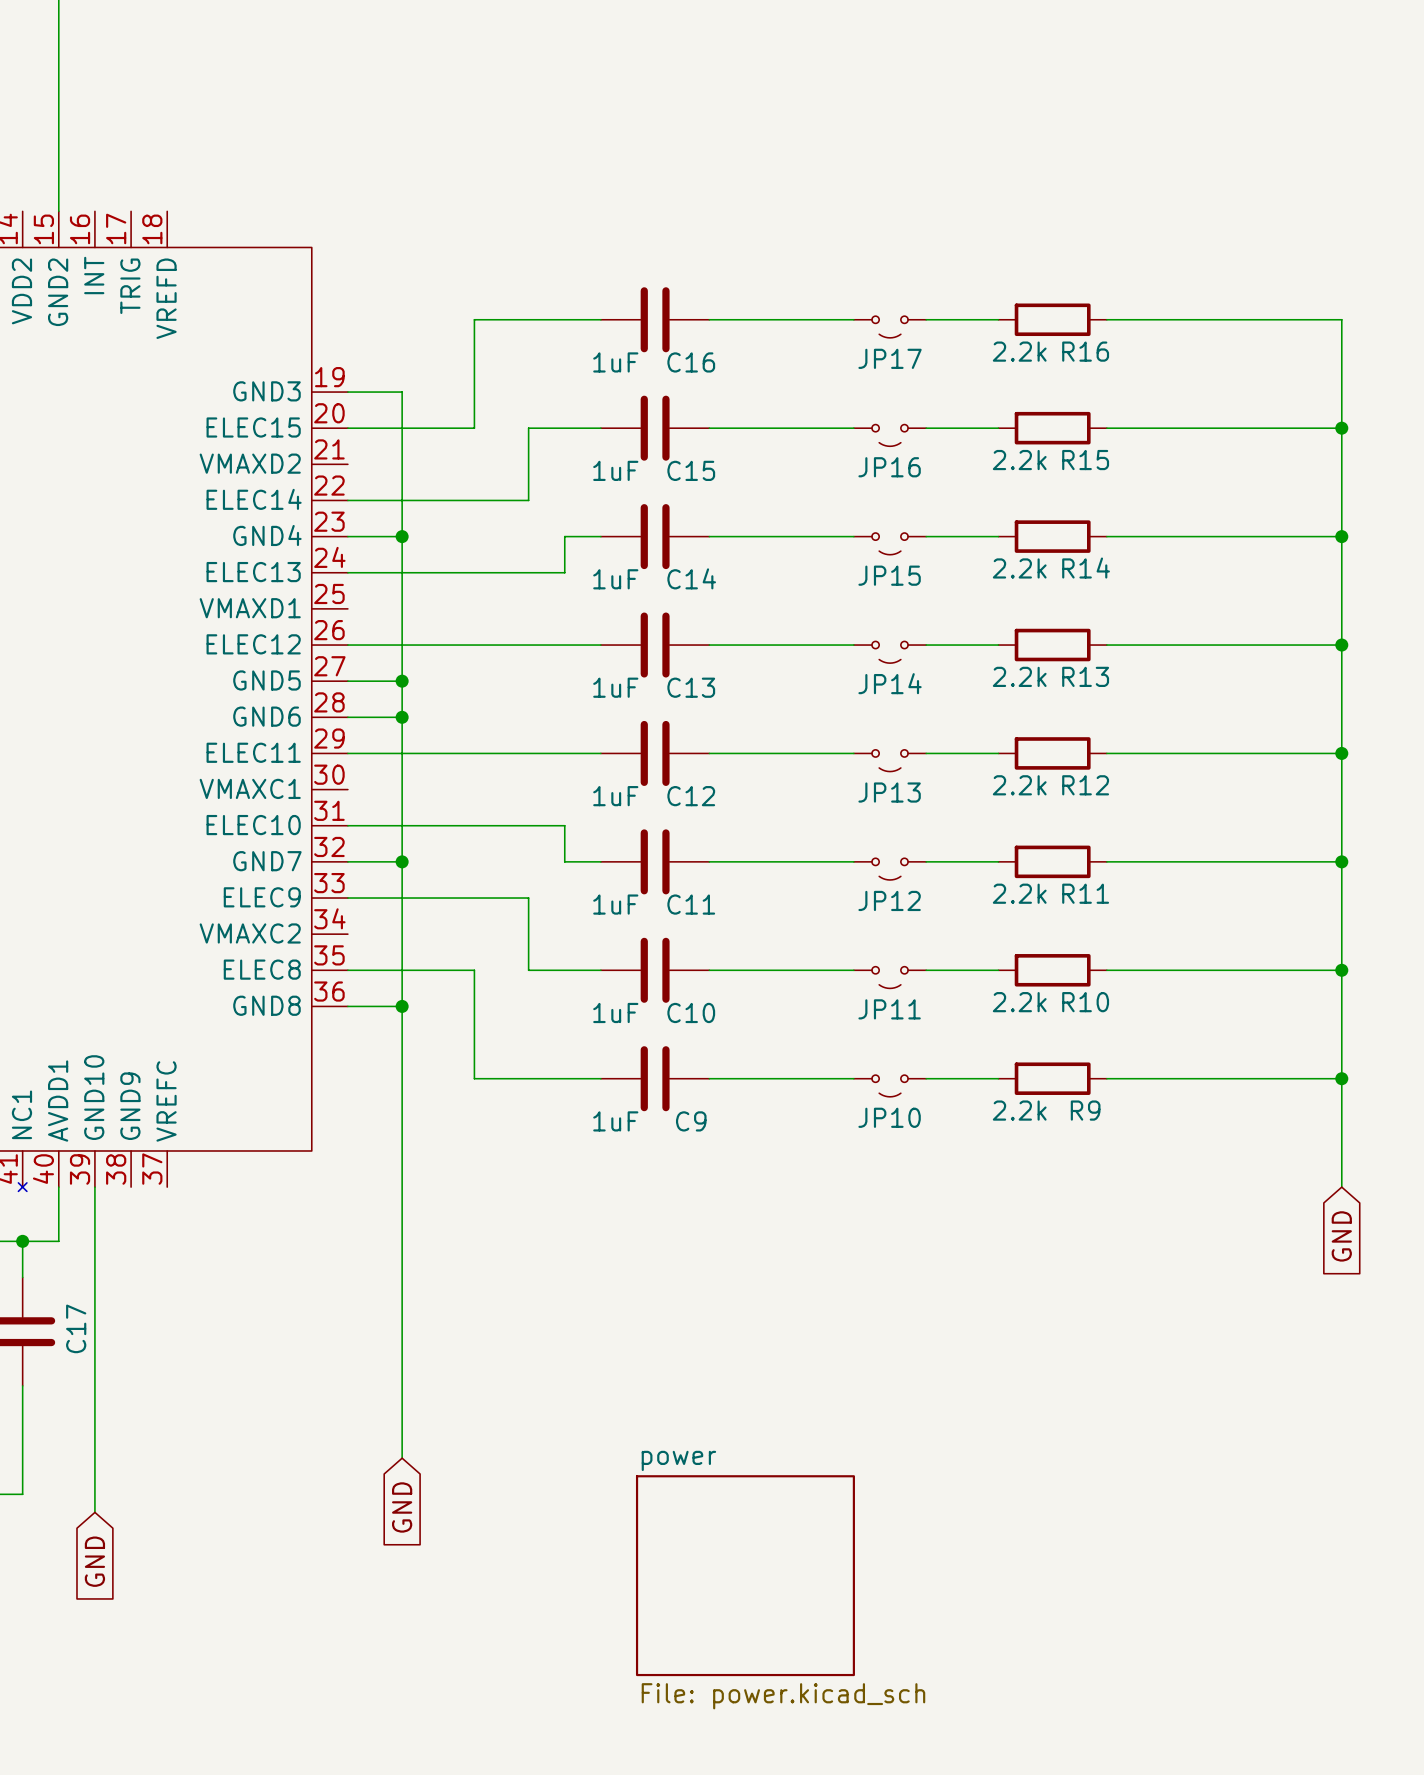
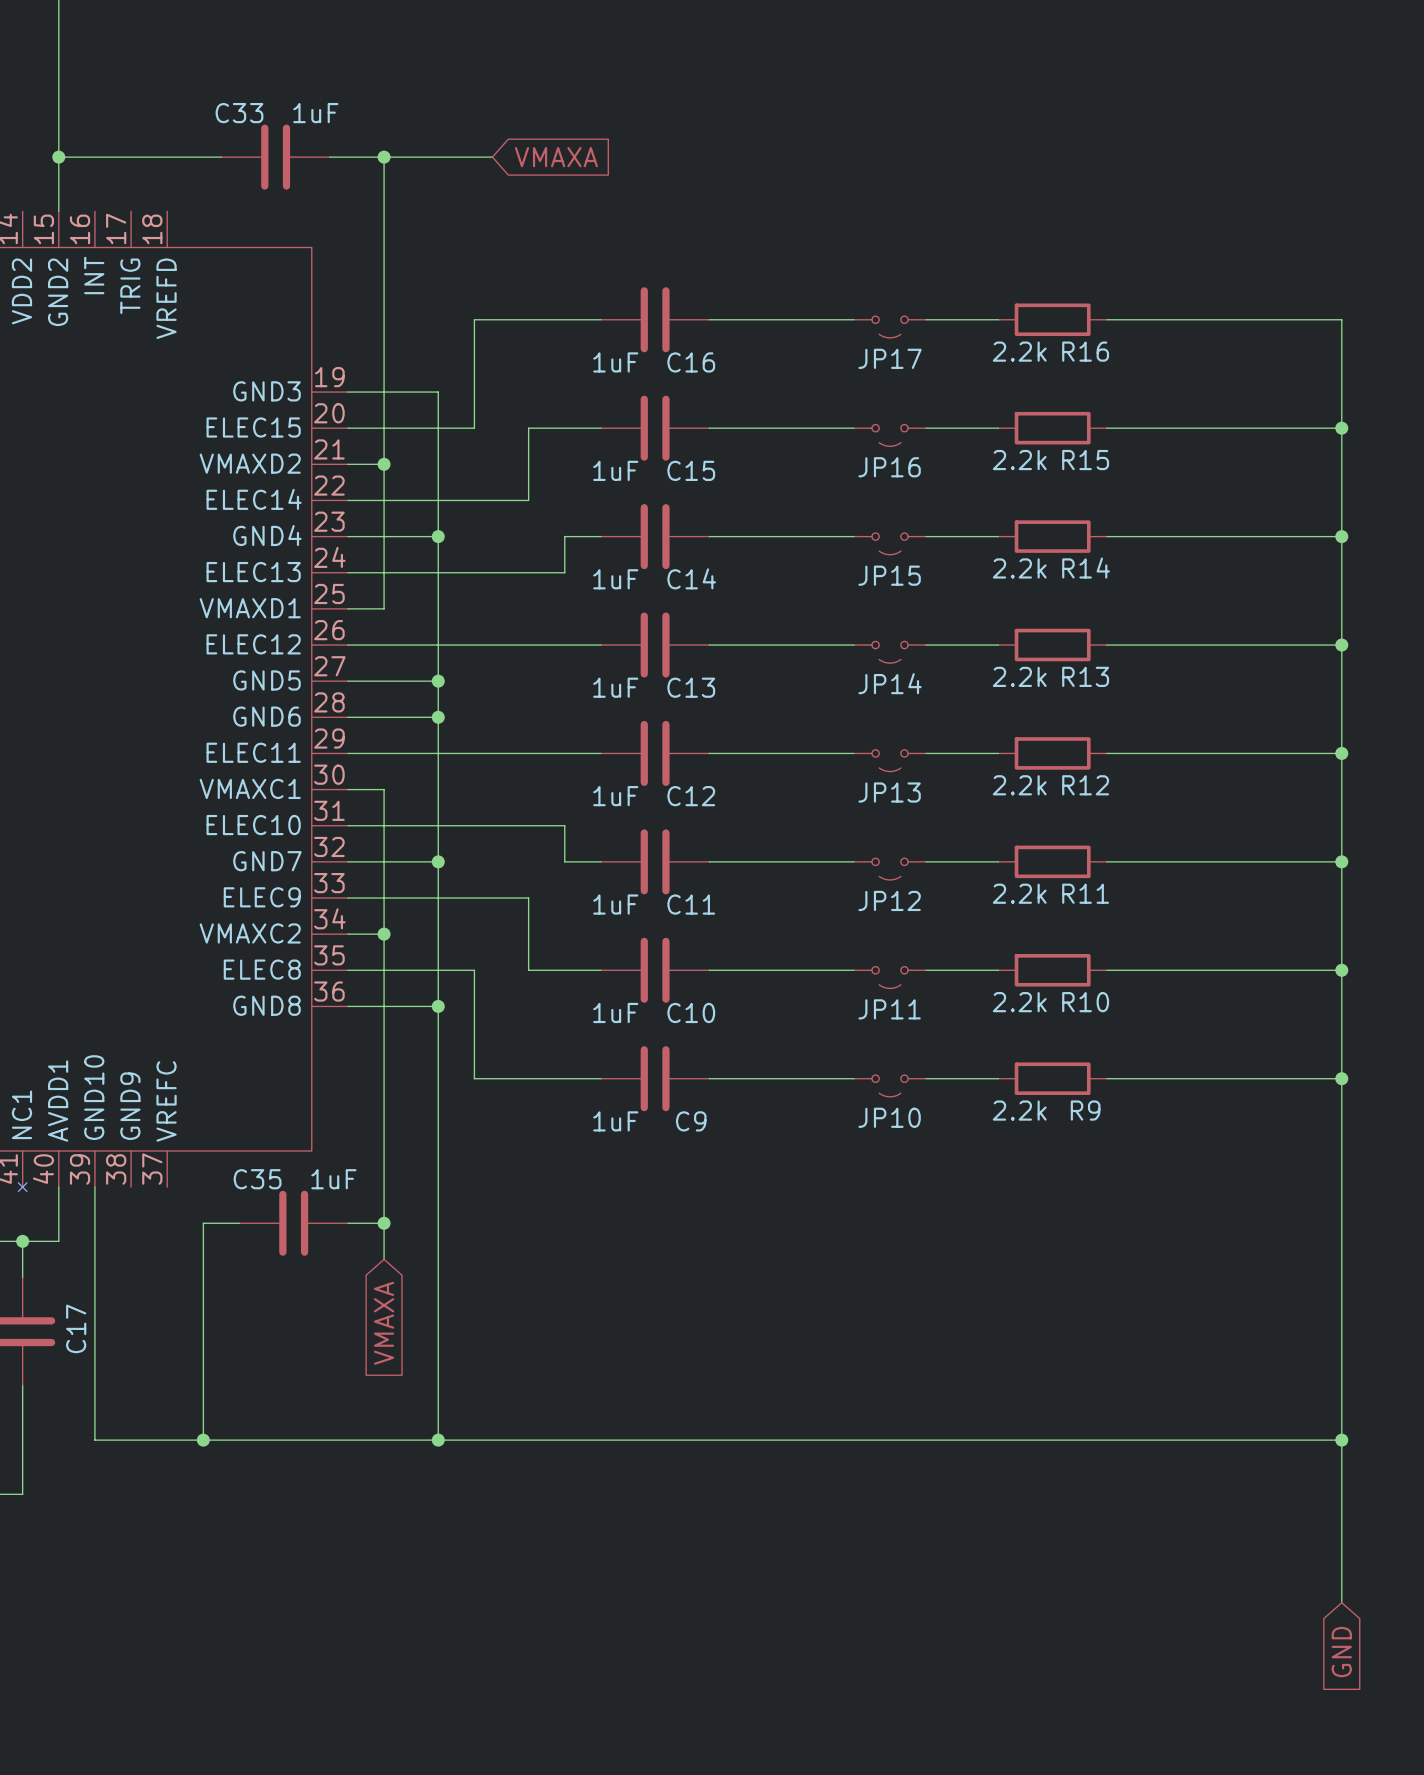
wire: none -> (58, 157) (221, 157)
junction: none -> (58, 157)
C33: none -> 1uF (275, 157)
wire: none -> (329, 157) (492, 157)
wire: none -> (384, 157) (384, 608) (347, 608)
junction: none -> (384, 157)
global label: none -> VMAXA (556, 157)
wire: (402, 392) (402, 1458) -> (402, 392) (438, 392) (438, 1440)
wire: none -> (347, 464) (384, 464)
junction: none -> (384, 464)
wire: none -> (402, 536) (438, 536)
junction position: (402, 536) -> (438, 536)
wire: none -> (402, 681) (438, 681)
junction: (402, 681) -> none
junction: none -> (438, 681)
wire: none -> (402, 717) (438, 717)
junction: (402, 717) -> none
junction: none -> (438, 717)
wire: none -> (347, 789) (384, 789) (384, 1259)
wire: none -> (402, 861) (438, 861)
junction position: (402, 861) -> (438, 861)
wire: none -> (347, 934) (384, 934)
junction: none -> (384, 934)
wire: none -> (402, 1006) (438, 1006)
junction position: (402, 1006) -> (438, 1006)
wire: none -> (1341, 1187) (1341, 1602)
wire: none -> (239, 1223) (203, 1223) (203, 1440)
C35: none -> 1uF (293, 1223)
wire: none -> (347, 1223) (384, 1223)
junction: none -> (384, 1223)
global label: GND (1341, 1236) -> none
global label: none -> VMAXA (384, 1323)
wire: (94, 1440) (94, 1512) -> (94, 1440) (1341, 1440)
junction: none -> (203, 1440)
junction: none -> (438, 1440)
junction: none -> (1341, 1440)
global label: GND (402, 1507) -> none
global label: GND (94, 1561) -> none
sheet power: File: power.kicad_sch (745, 1575) -> none
global label: none -> GND (1341, 1652)

